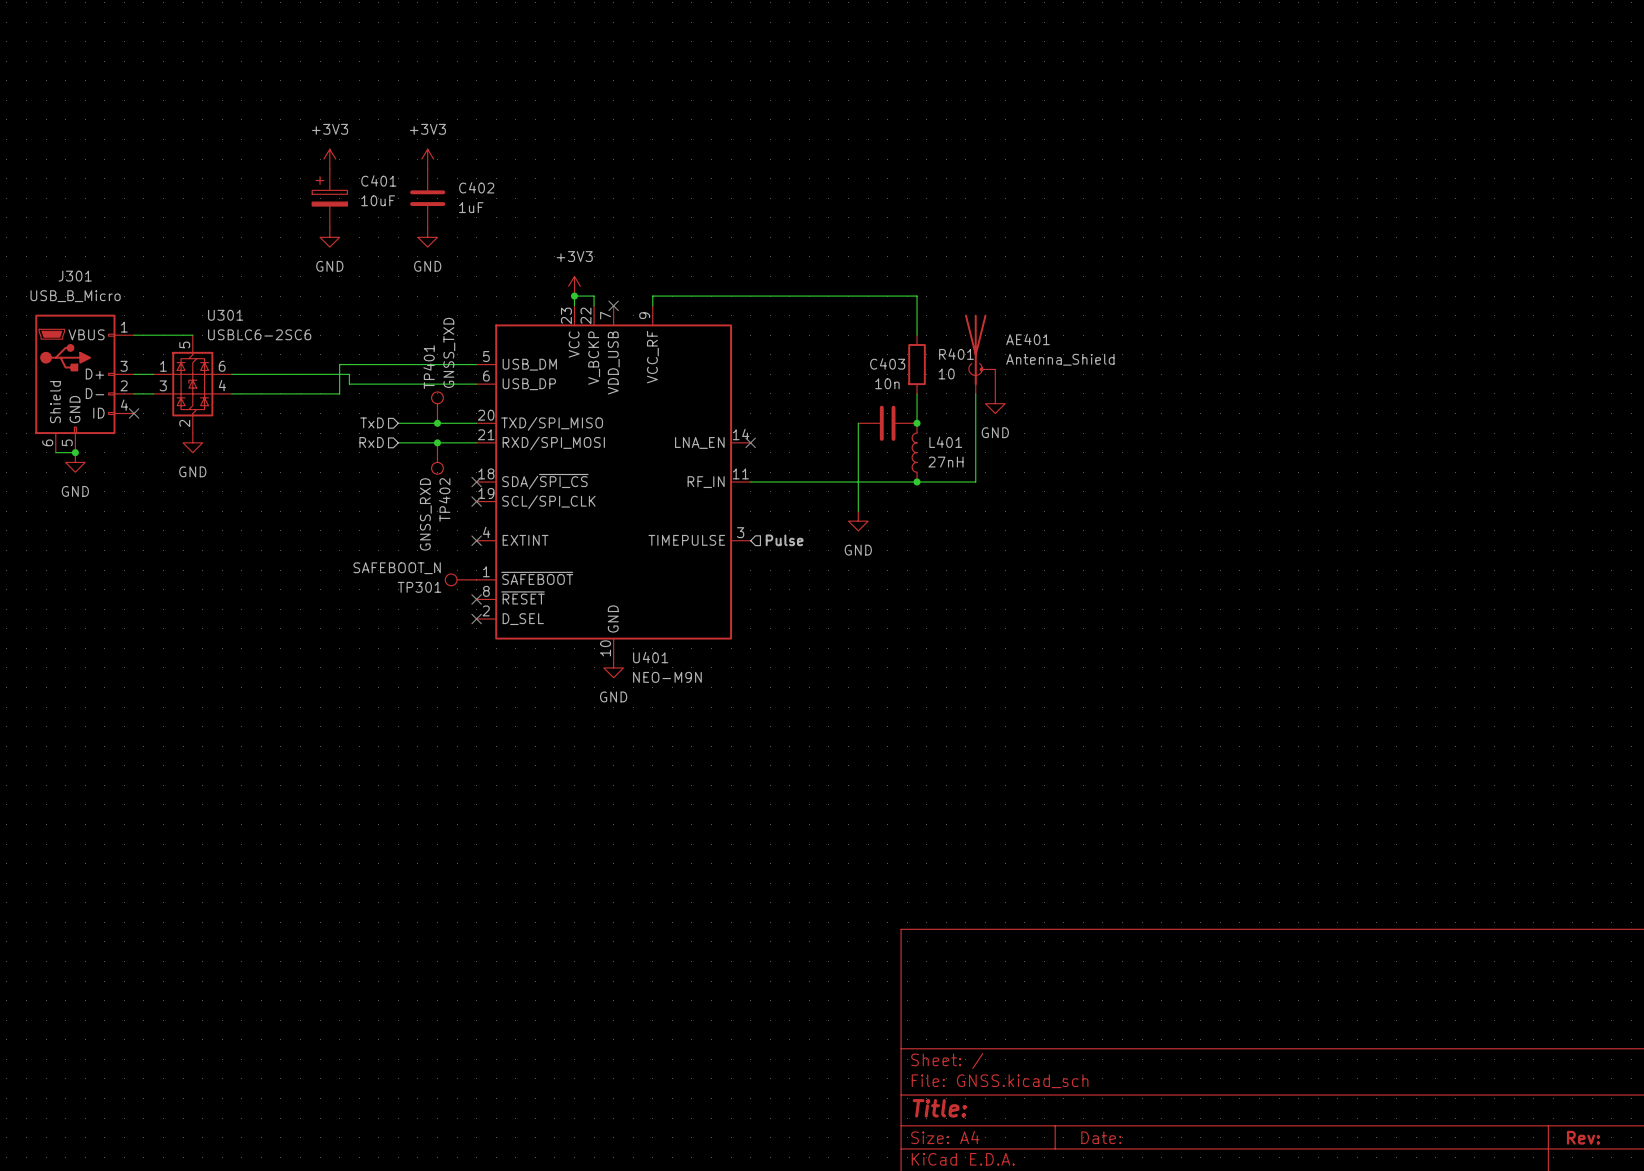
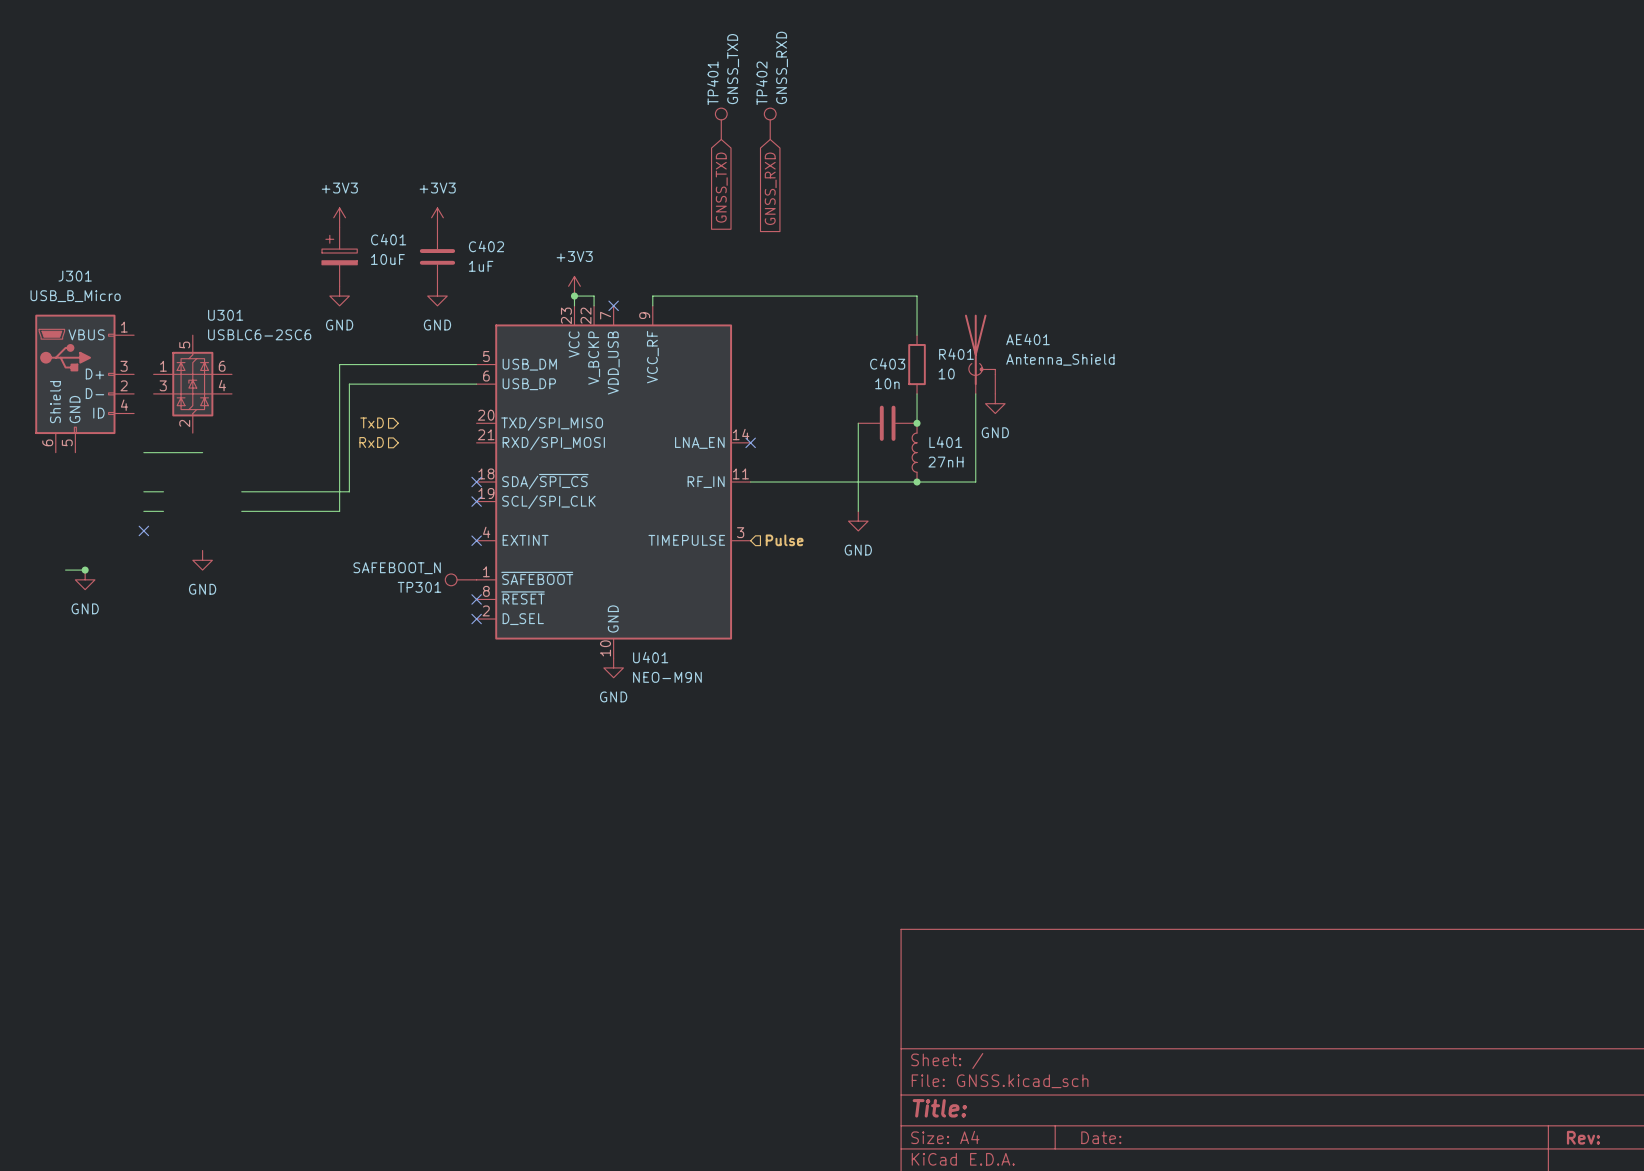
power symbol: +3V3 (329, 159) -> none
power symbol: +3V3 (427, 159) -> none
global label: none -> GNSS_TXD (721, 187)
global label: none -> GNSS_RXD (770, 188)
C401 position: (329, 198) -> (339, 256)
C402 position: (427, 198) -> (437, 256)
power symbol: none -> +3V3 (339, 217)
power symbol: none -> +3V3 (437, 217)
power symbol: GND (329, 237) -> none
power symbol: GND (427, 237) -> none
power symbol: none -> GND (339, 296)
power symbol: none -> GND (437, 296)
wire: (134, 335) (192, 335) -> (143, 452) (202, 452)
wire: (134, 374) (153, 374) -> (143, 491) (163, 491)
wire: (231, 374) (349, 374) (349, 384) -> (241, 491) (349, 491) (349, 384)
wire: (134, 393) (153, 393) -> (143, 511) (163, 511)
wire: (231, 393) (339, 393) -> (241, 511) (339, 511) (339, 393)
TP401 position: (437, 407) -> (721, 123)
no-connect mark: (134, 413) -> none
wire: (398, 423) (476, 423) -> none
junction: (437, 423) -> none
power symbol: GND (192, 442) -> none
wire: (398, 442) (476, 442) -> none
junction: (437, 442) -> none
wire: (55, 452) (75, 452) -> (65, 570) (85, 570)
junction: (75, 452) -> none
TP402 position: (437, 458) -> (770, 123)
power symbol: GND (75, 462) -> none
TP402 rotation: 0° (437, 468) -> 180° (770, 114)
no-connect mark: none -> (143, 530)
power symbol: none -> GND (202, 560)
junction: none -> (85, 570)
power symbol: none -> GND (85, 579)

